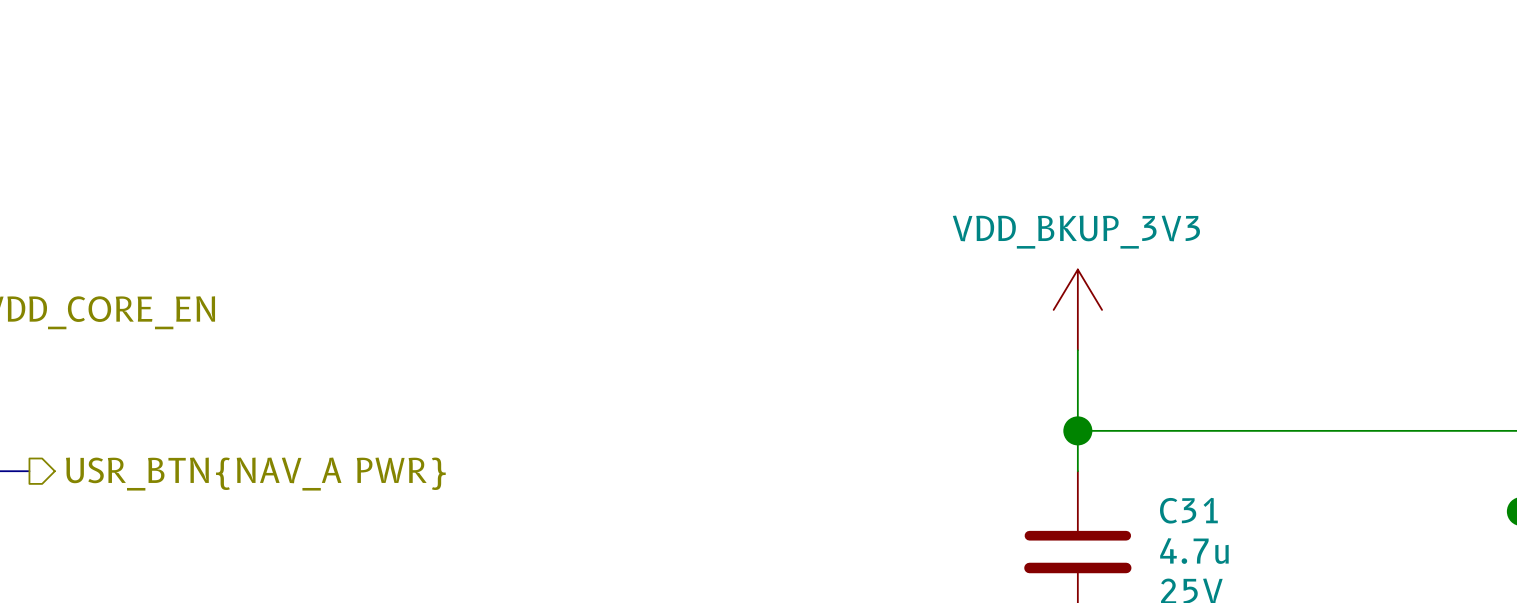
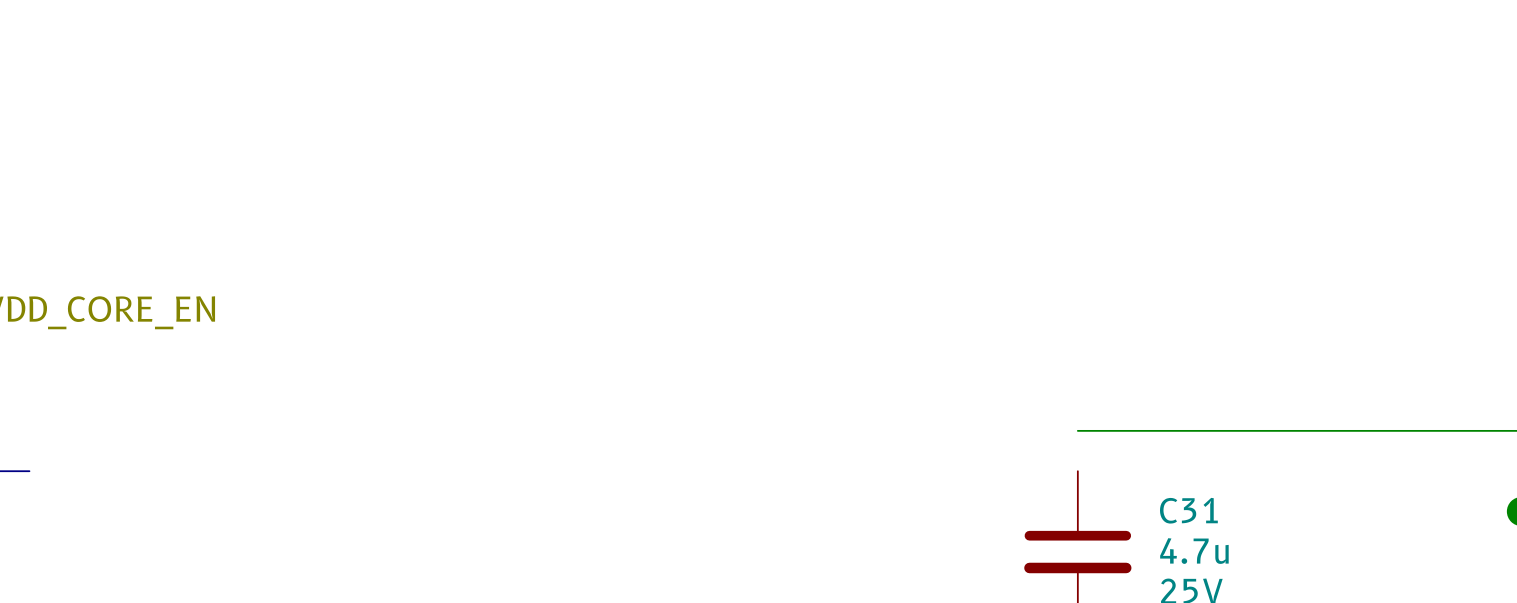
power symbol: VDD_BKUP_3V3 (1077, 309) -> none
wire: (1077, 350) (1077, 471) -> none
junction: (1077, 430) -> none
hierarchical label: USR_BTN{NAV_A PWR} (255, 474) -> none

